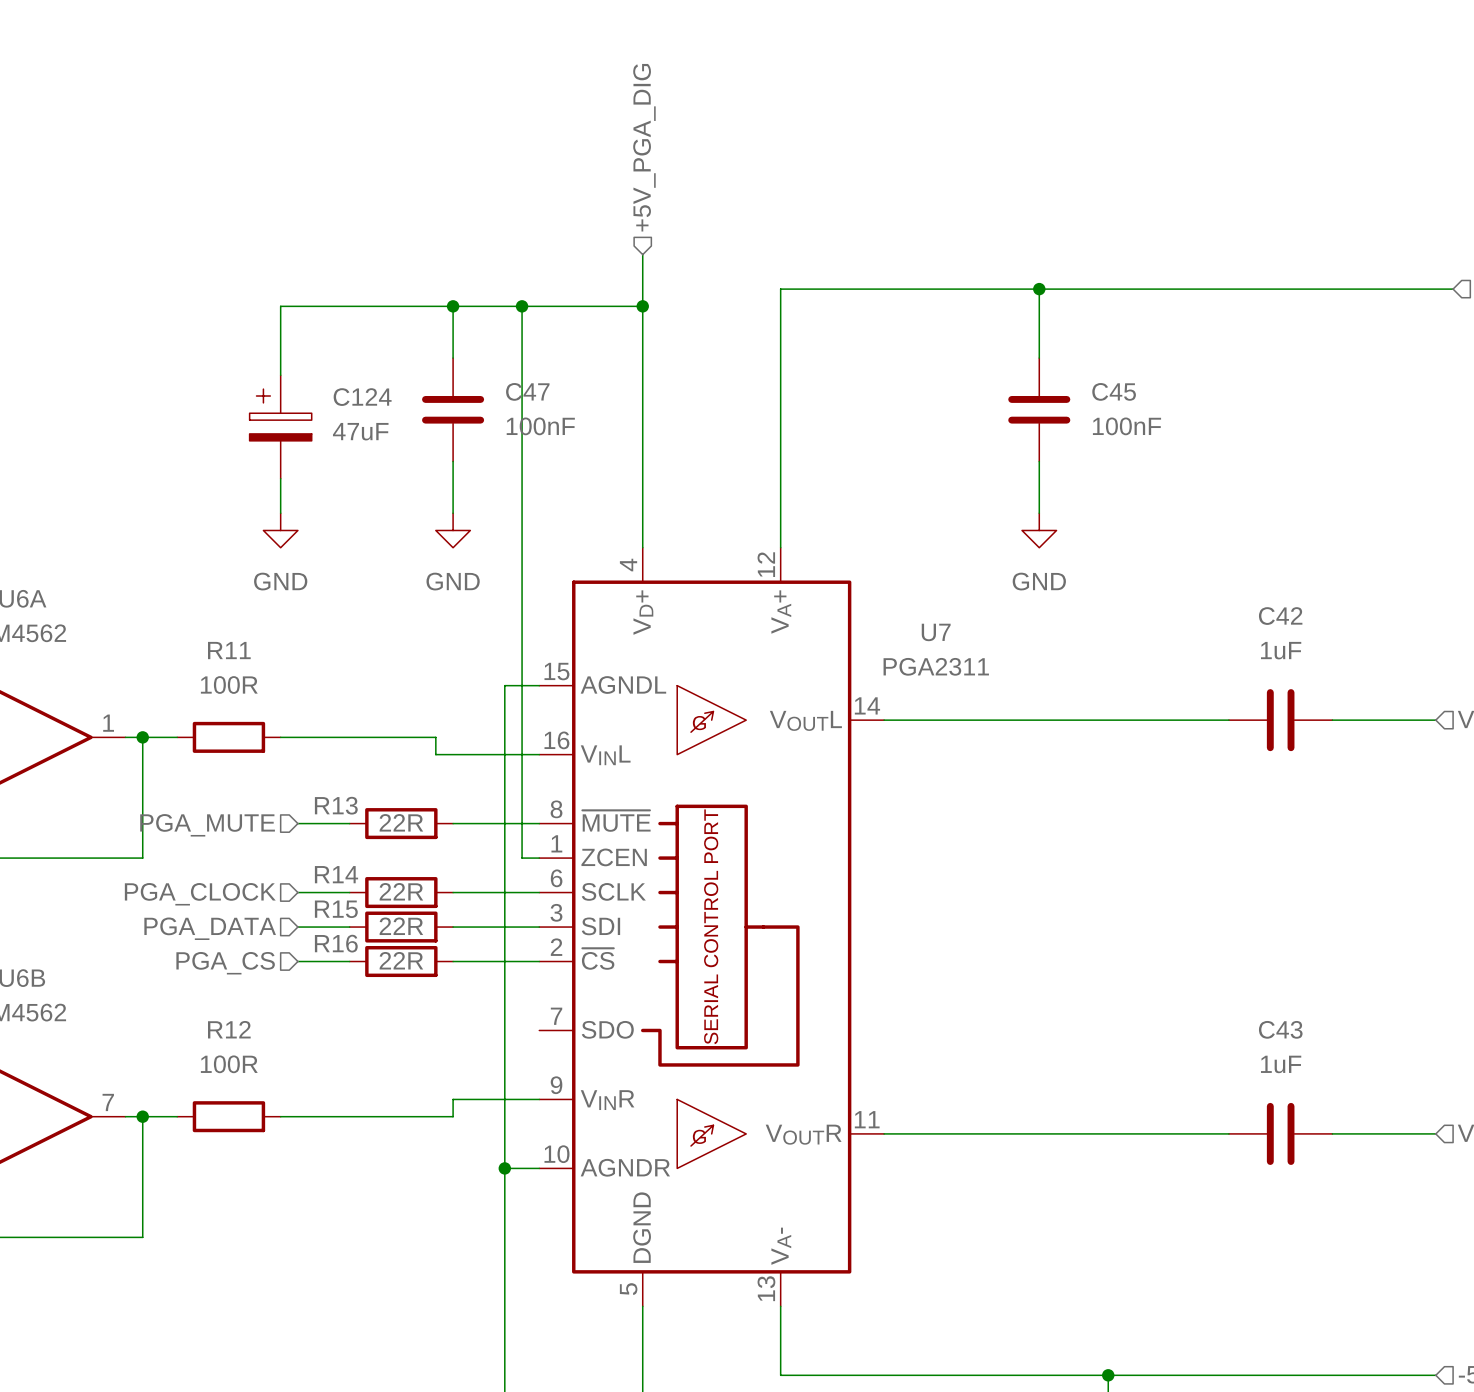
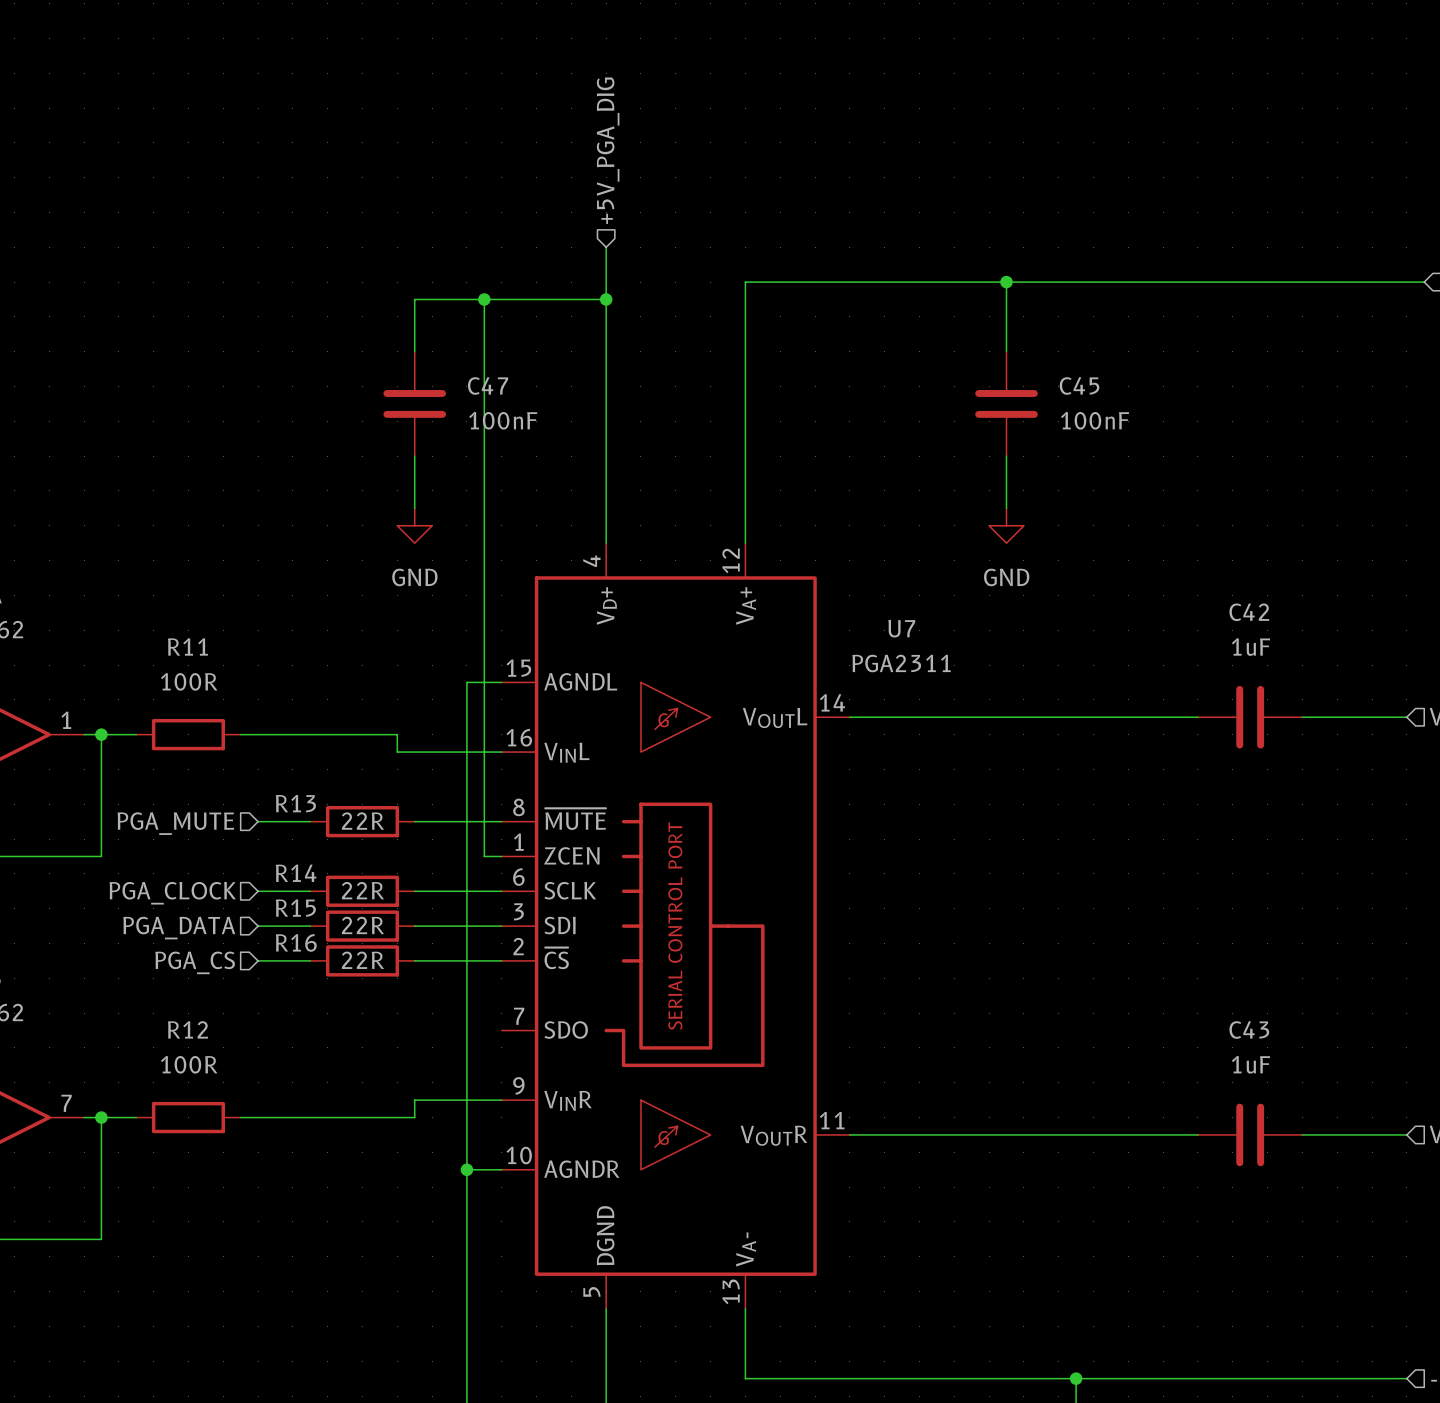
wire: (453, 306) (280, 306) (280, 375) -> none
junction: (453, 306) -> none
C124: 47uF (280, 427) -> none
wire: (280, 478) (280, 513) -> none
power symbol: GND (280, 530) -> none

